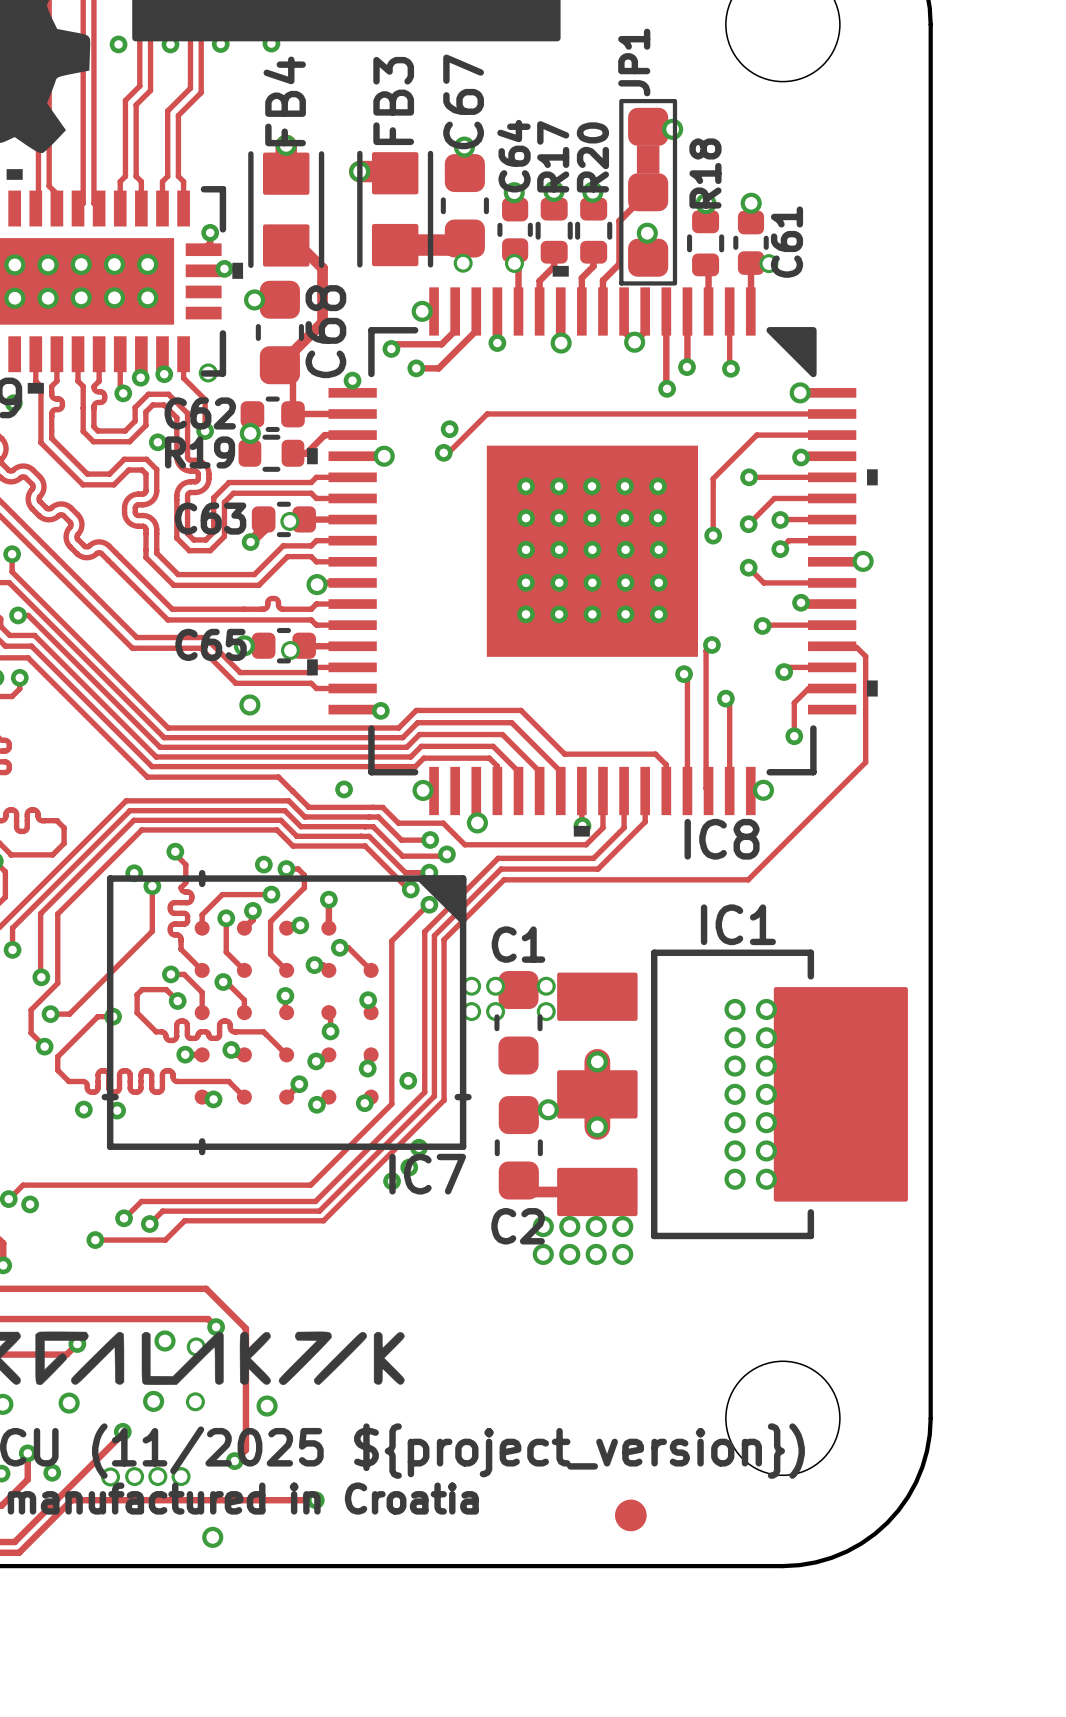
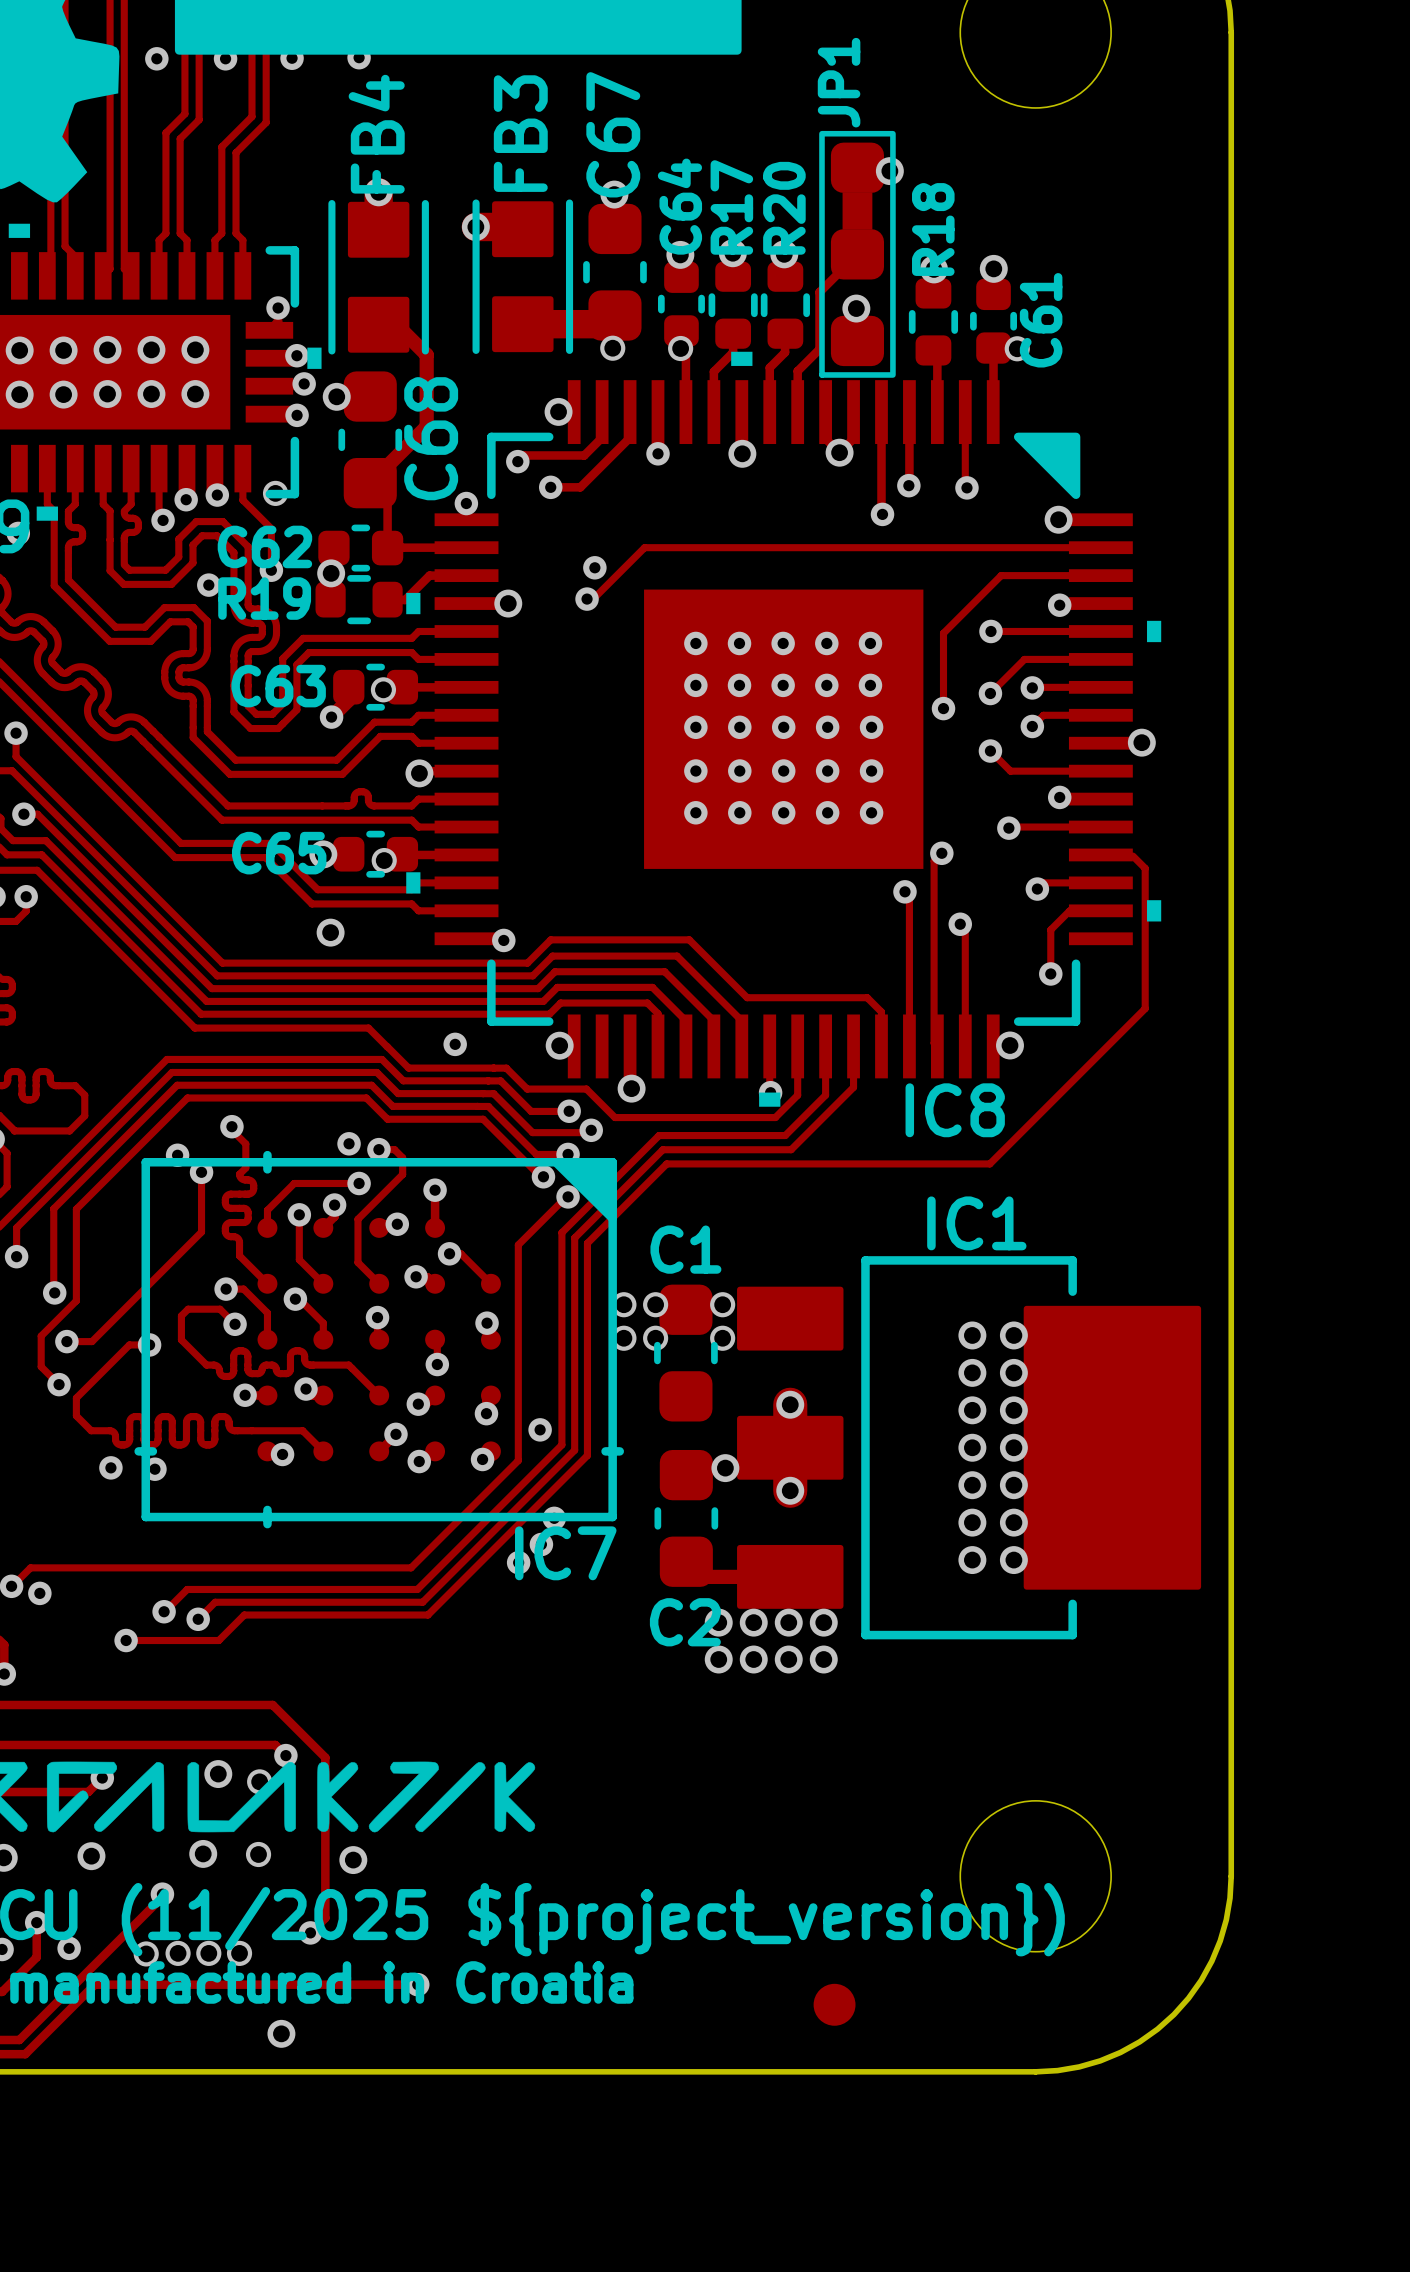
via: none -> (304, 383)
via: none -> (297, 415)

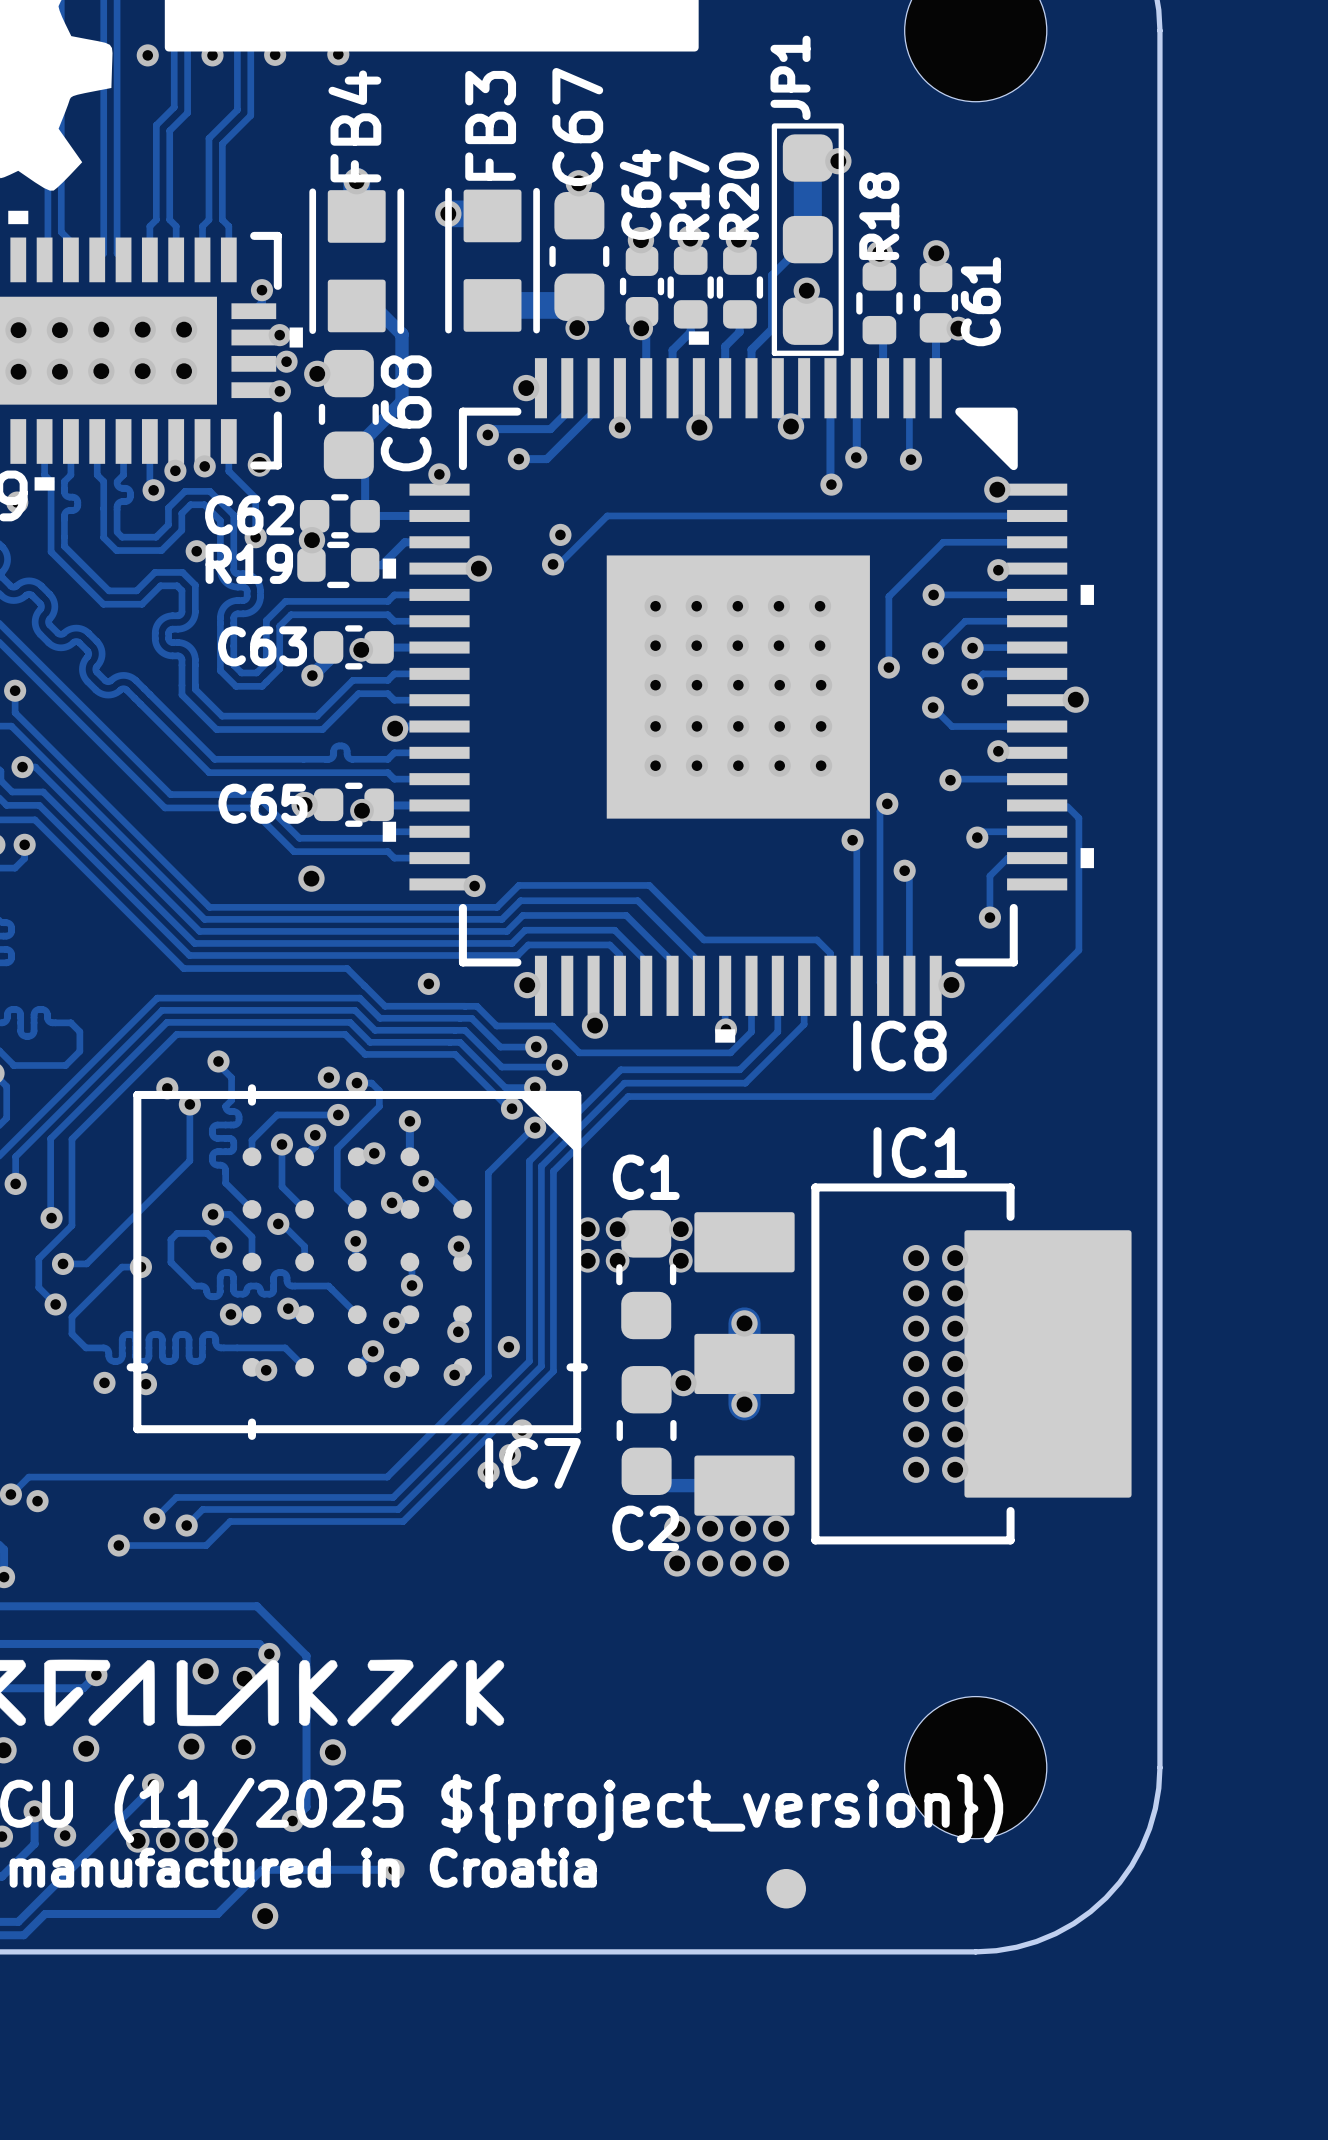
track: (278, 1984) (94, 1984) (47, 2031) -> (261, 1869) (217, 1913) (45, 1913)

